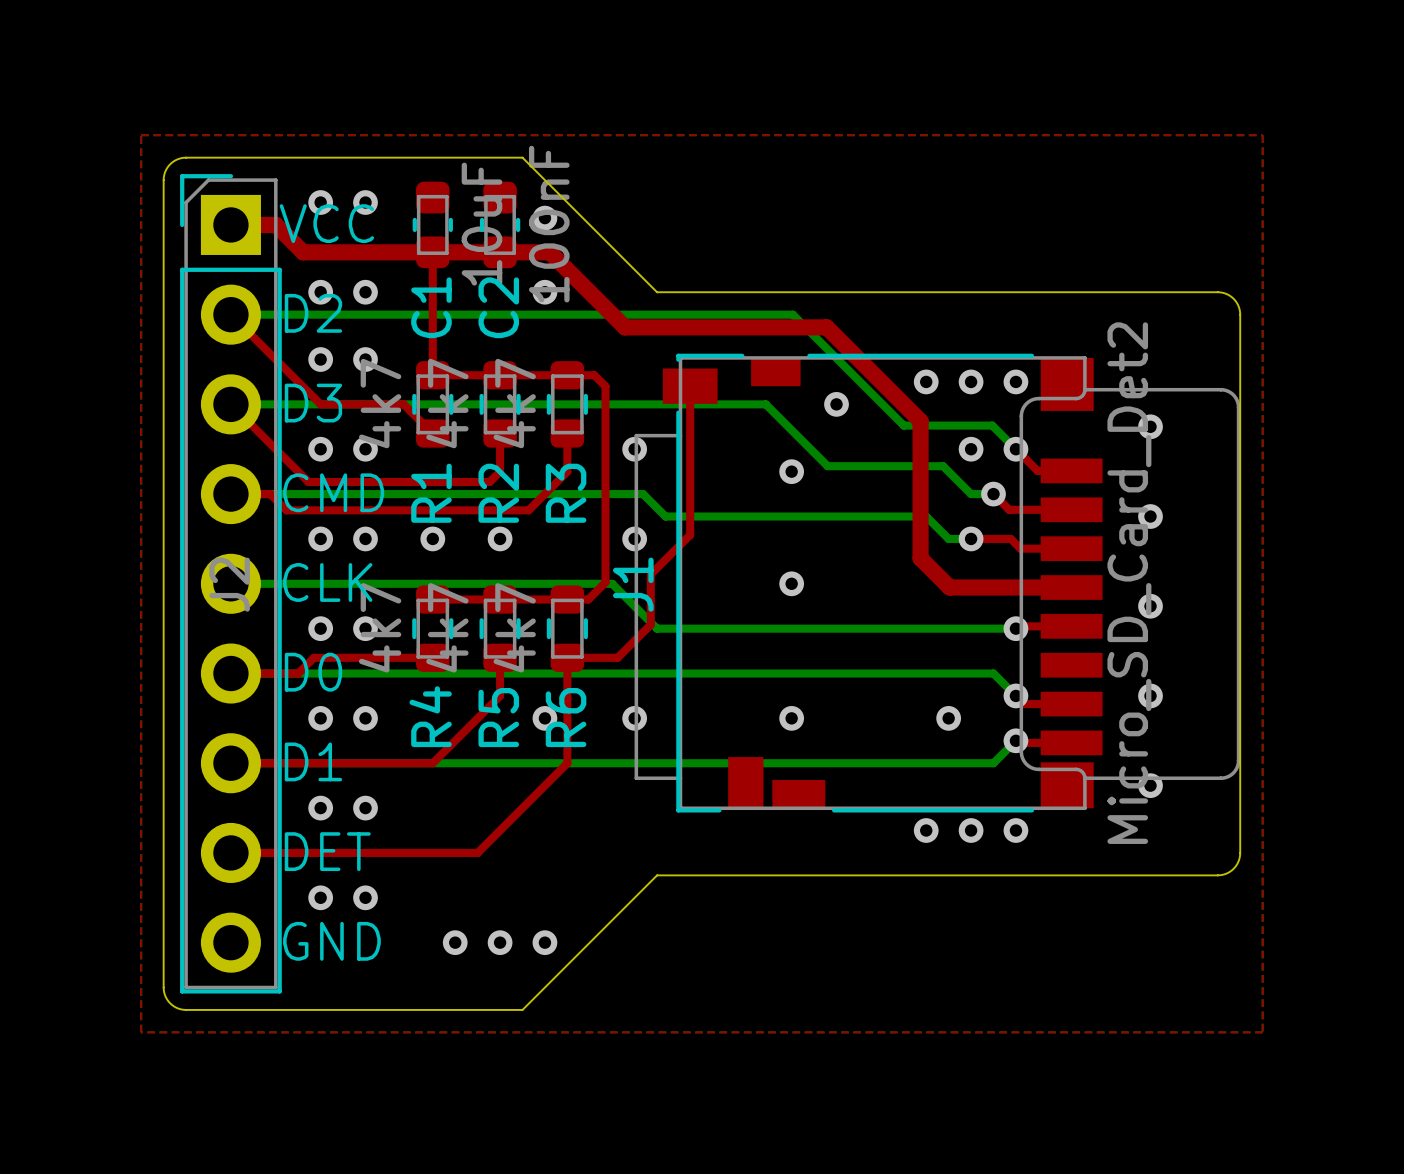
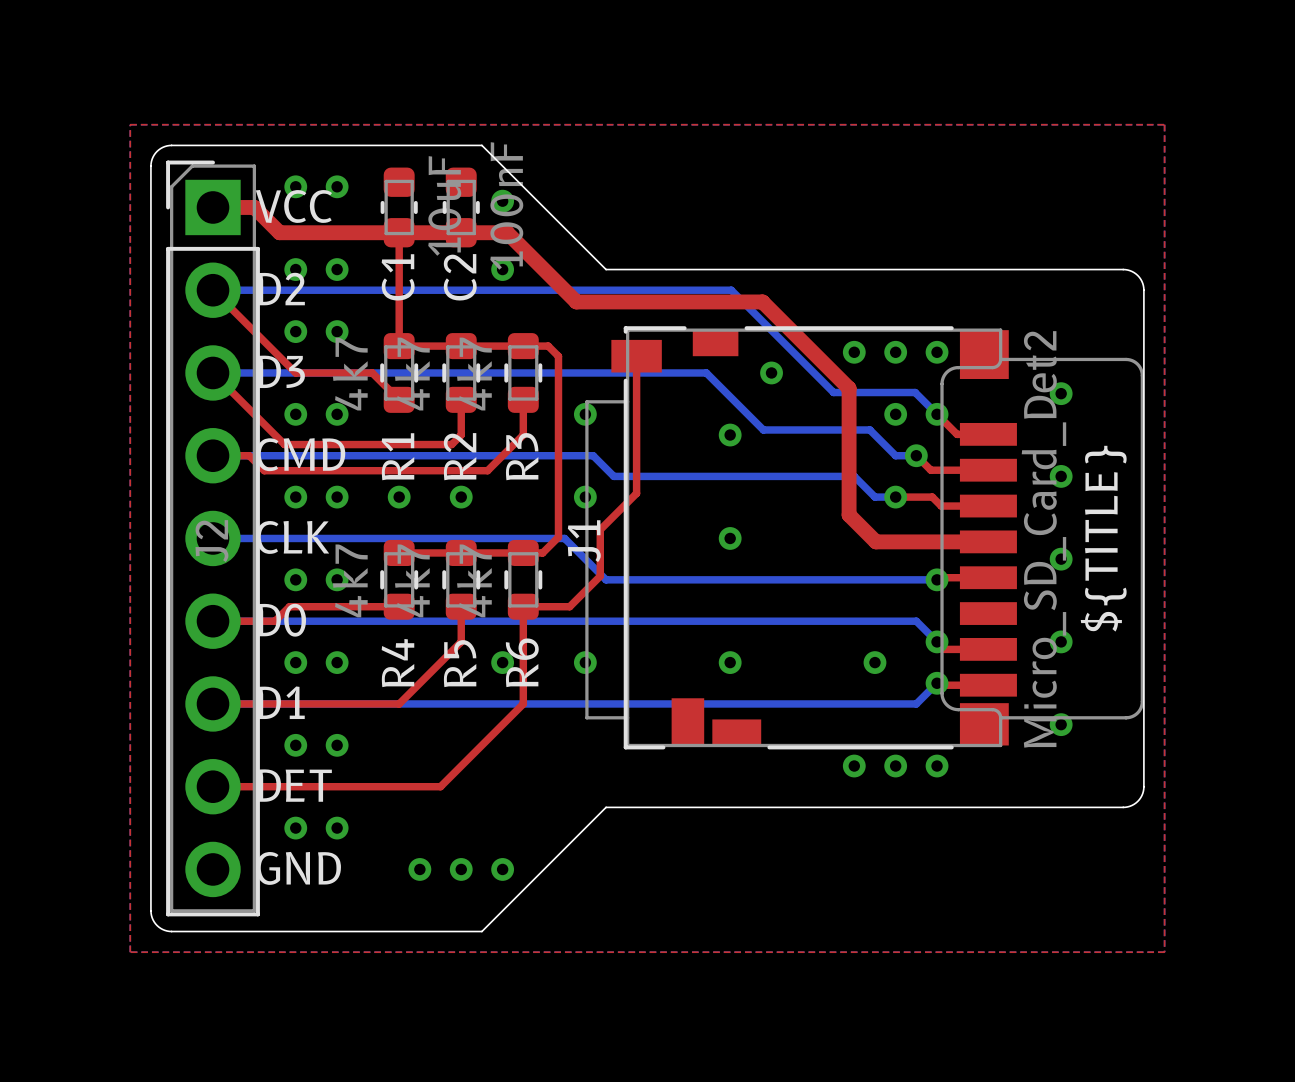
text: none -> ${TITLE} (1103, 538)

